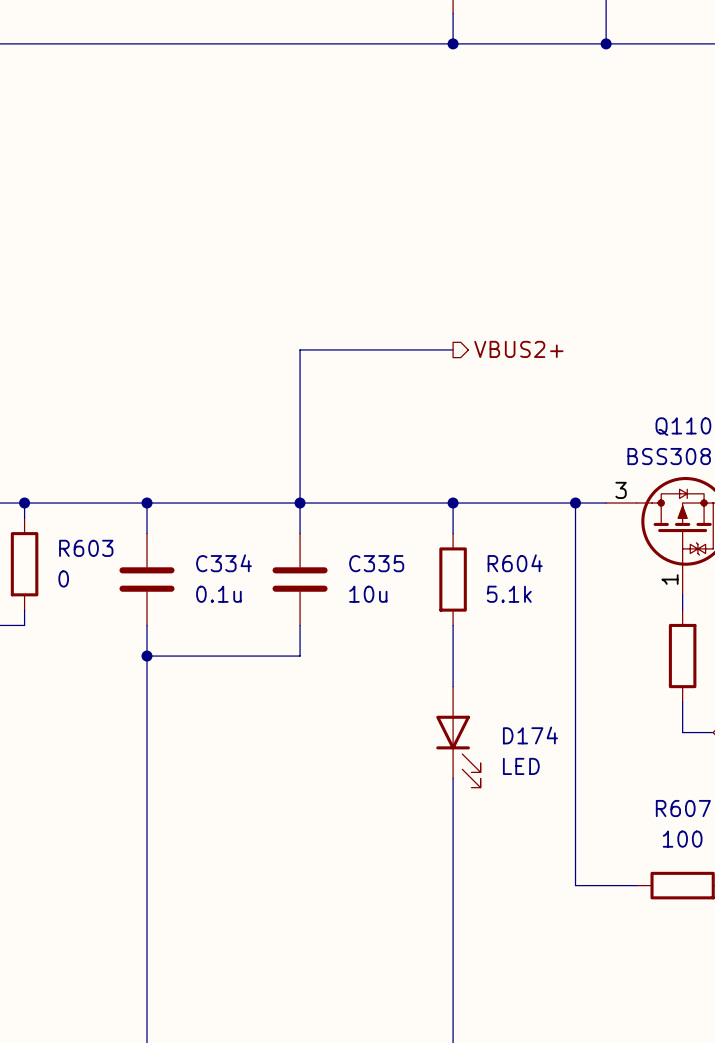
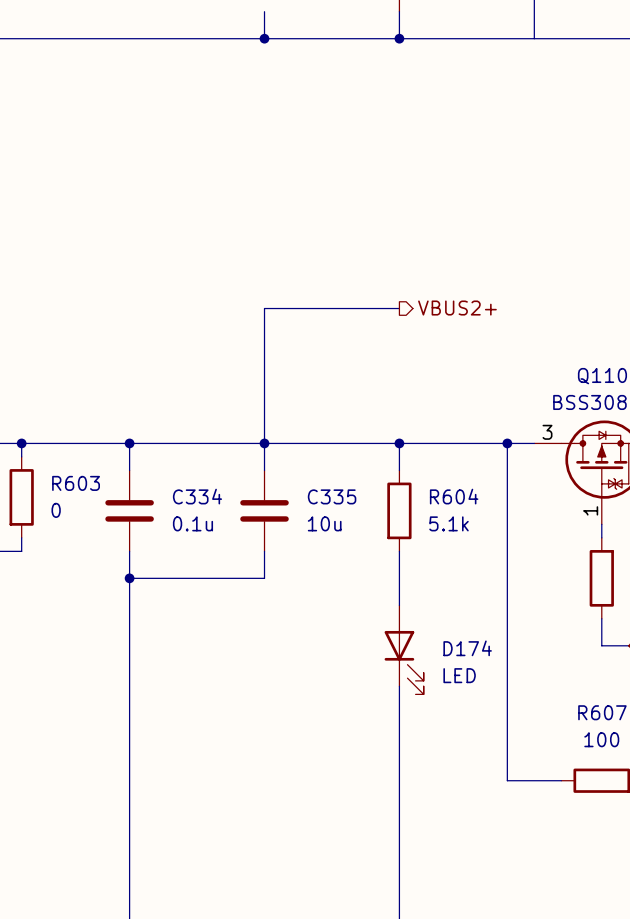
wire: none -> (264, 11) (264, 38)
junction: none -> (264, 38)
junction: (606, 43) -> none

